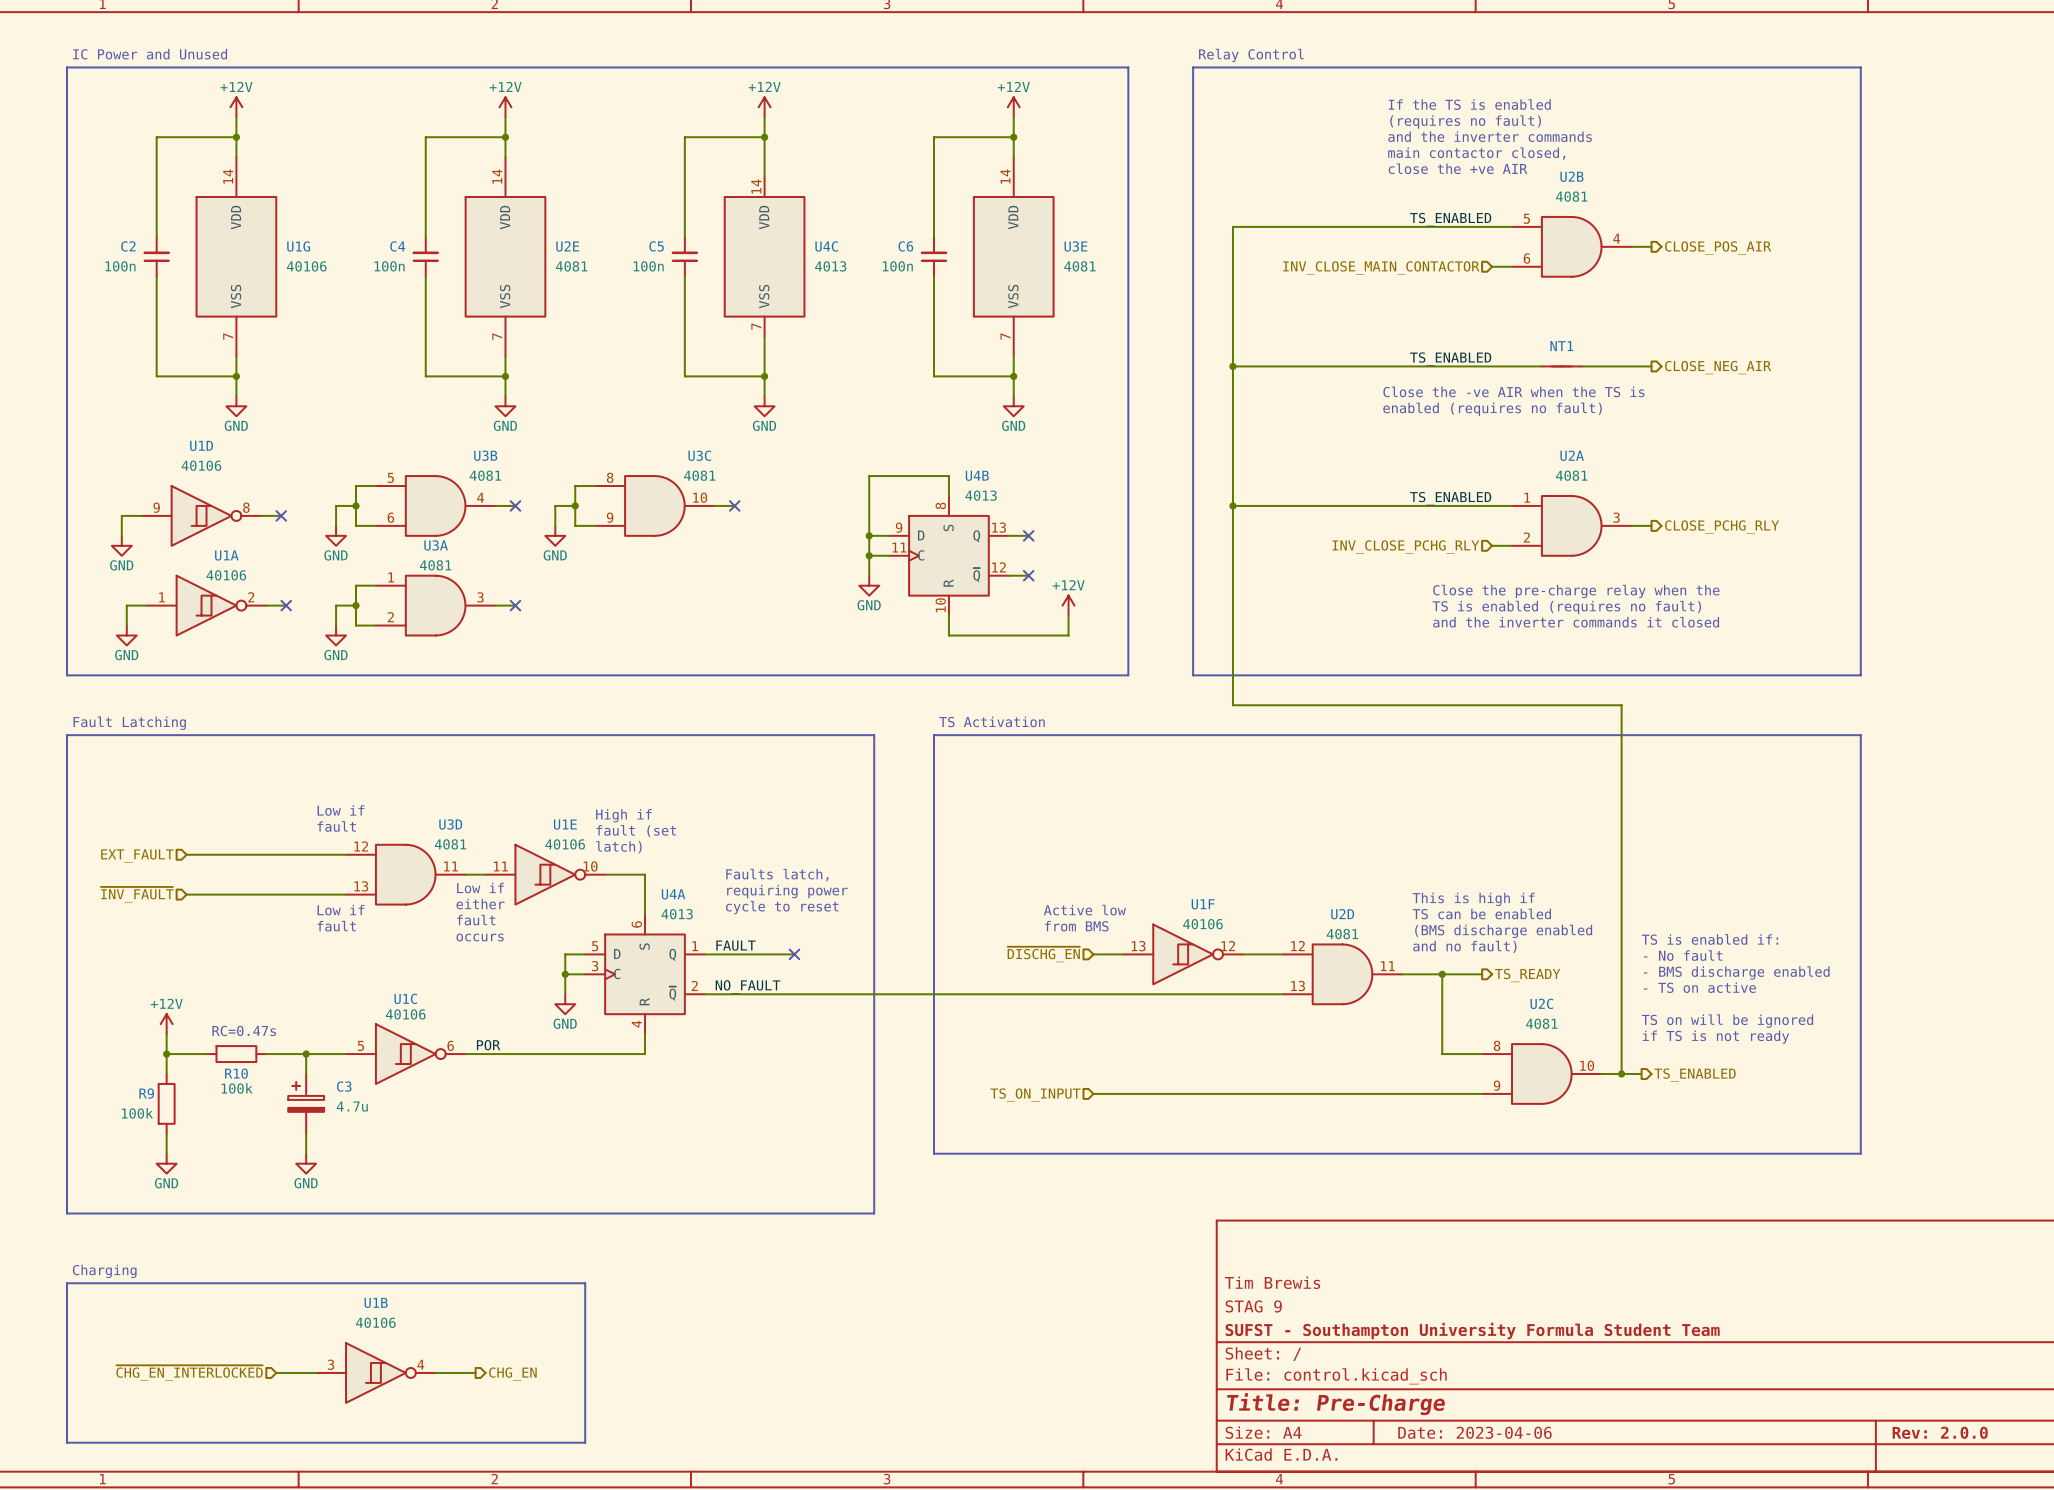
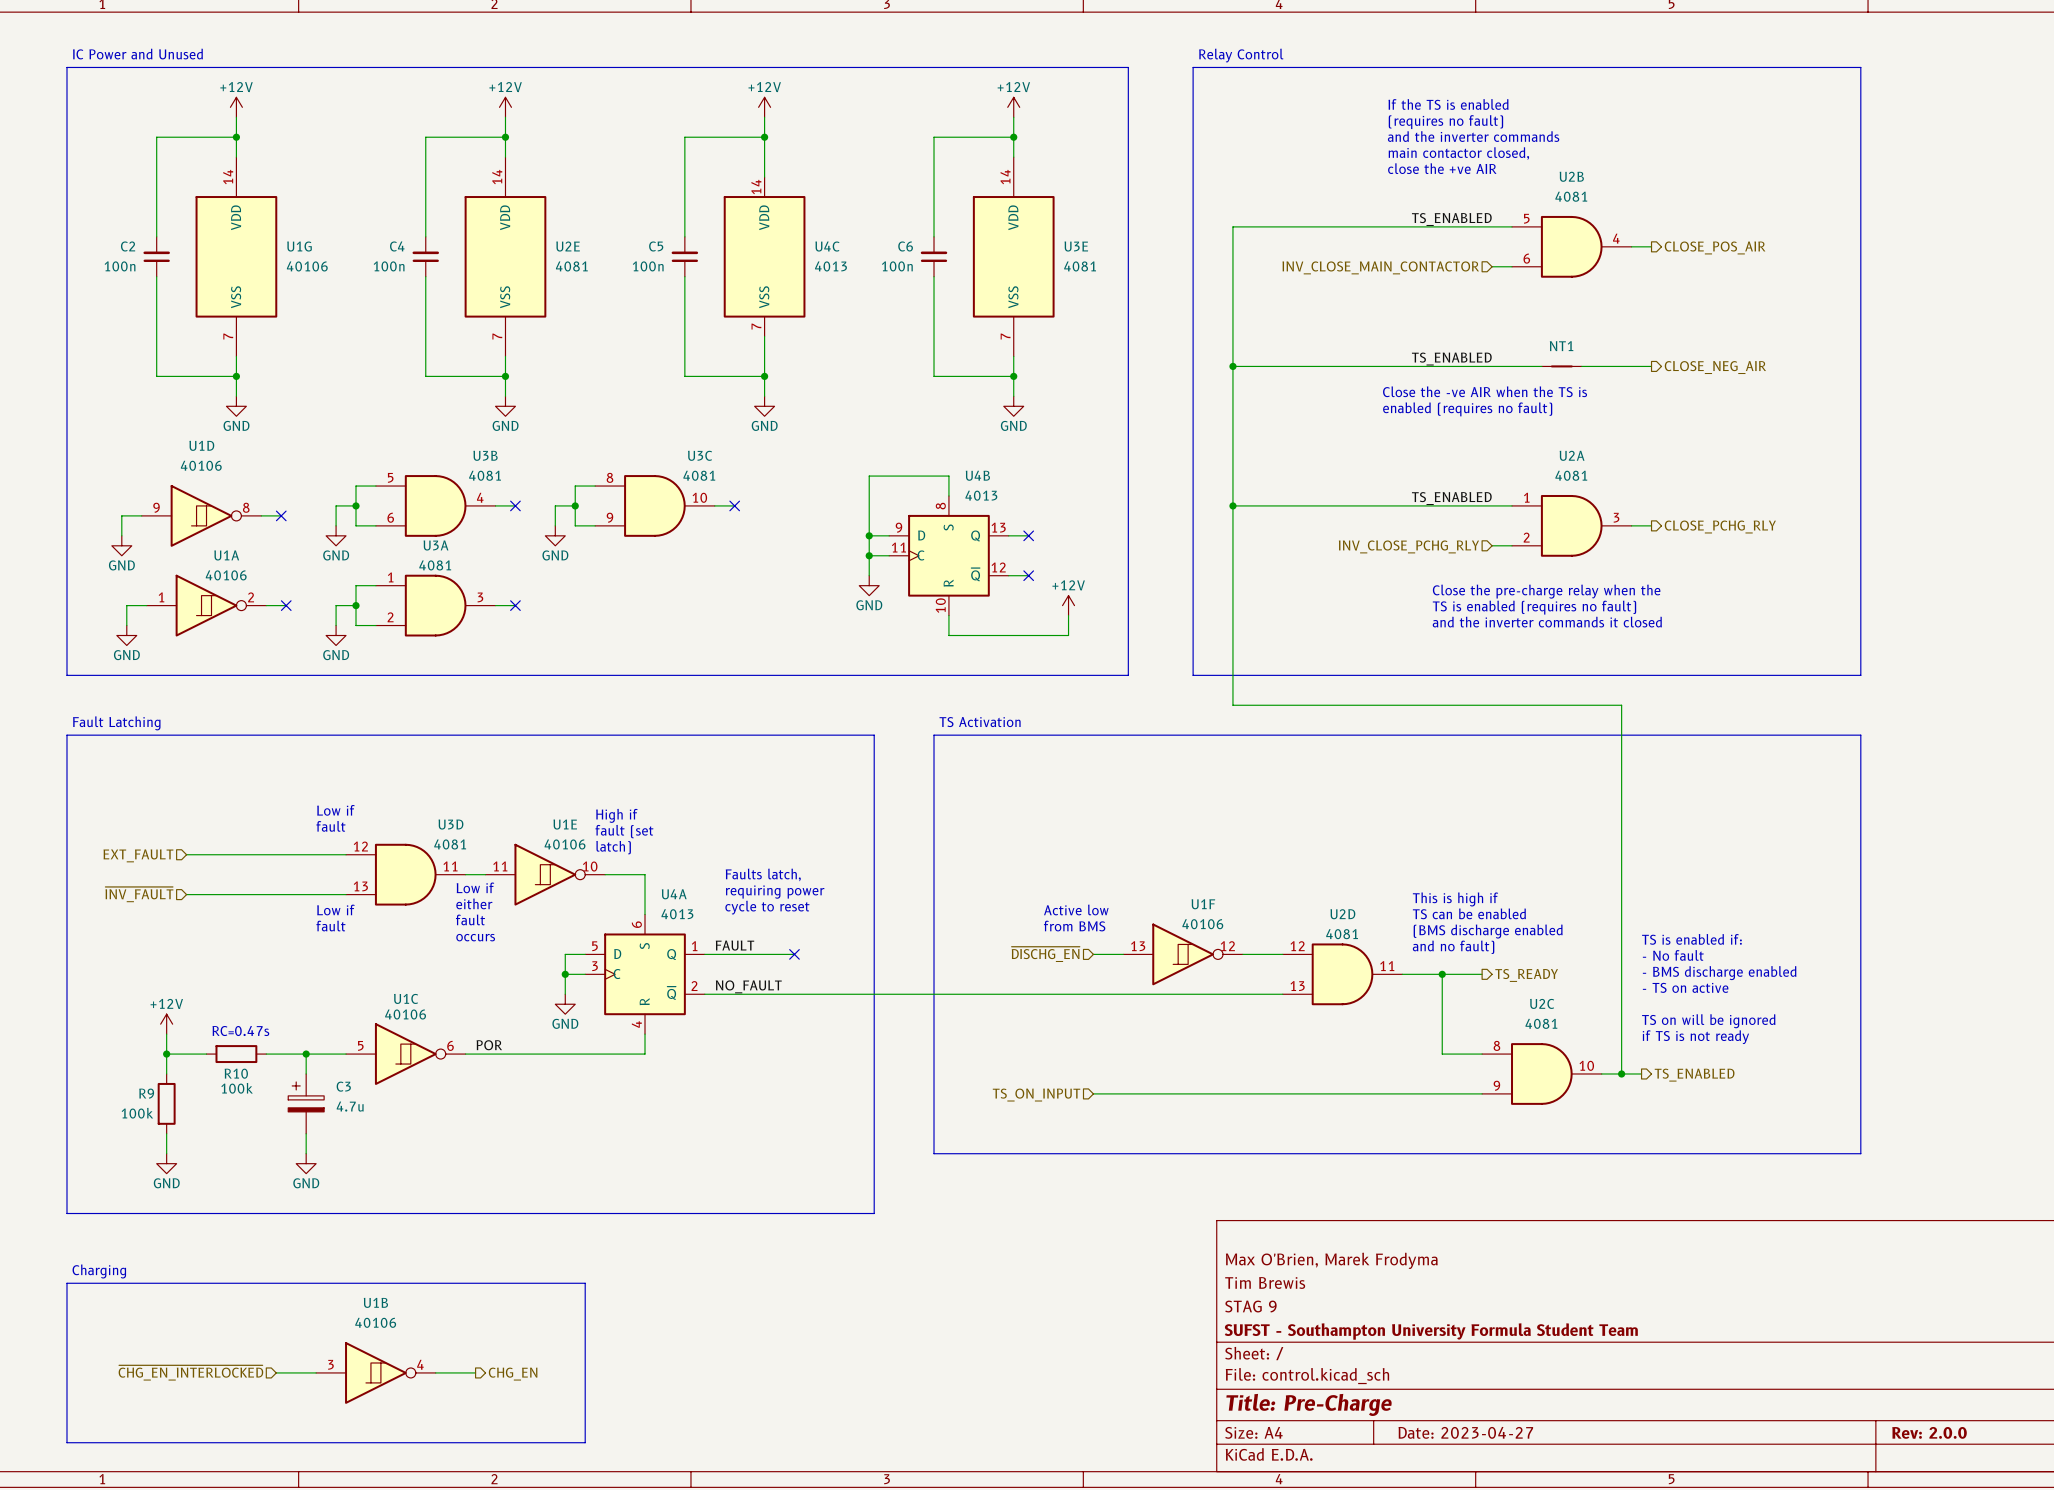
title block: none -> Max O'Brien, Marek Frodyma (1331, 1260)
title block: Date: 2023-04-06 (1474, 1432) -> Date: 2023-04-27 (1465, 1432)

